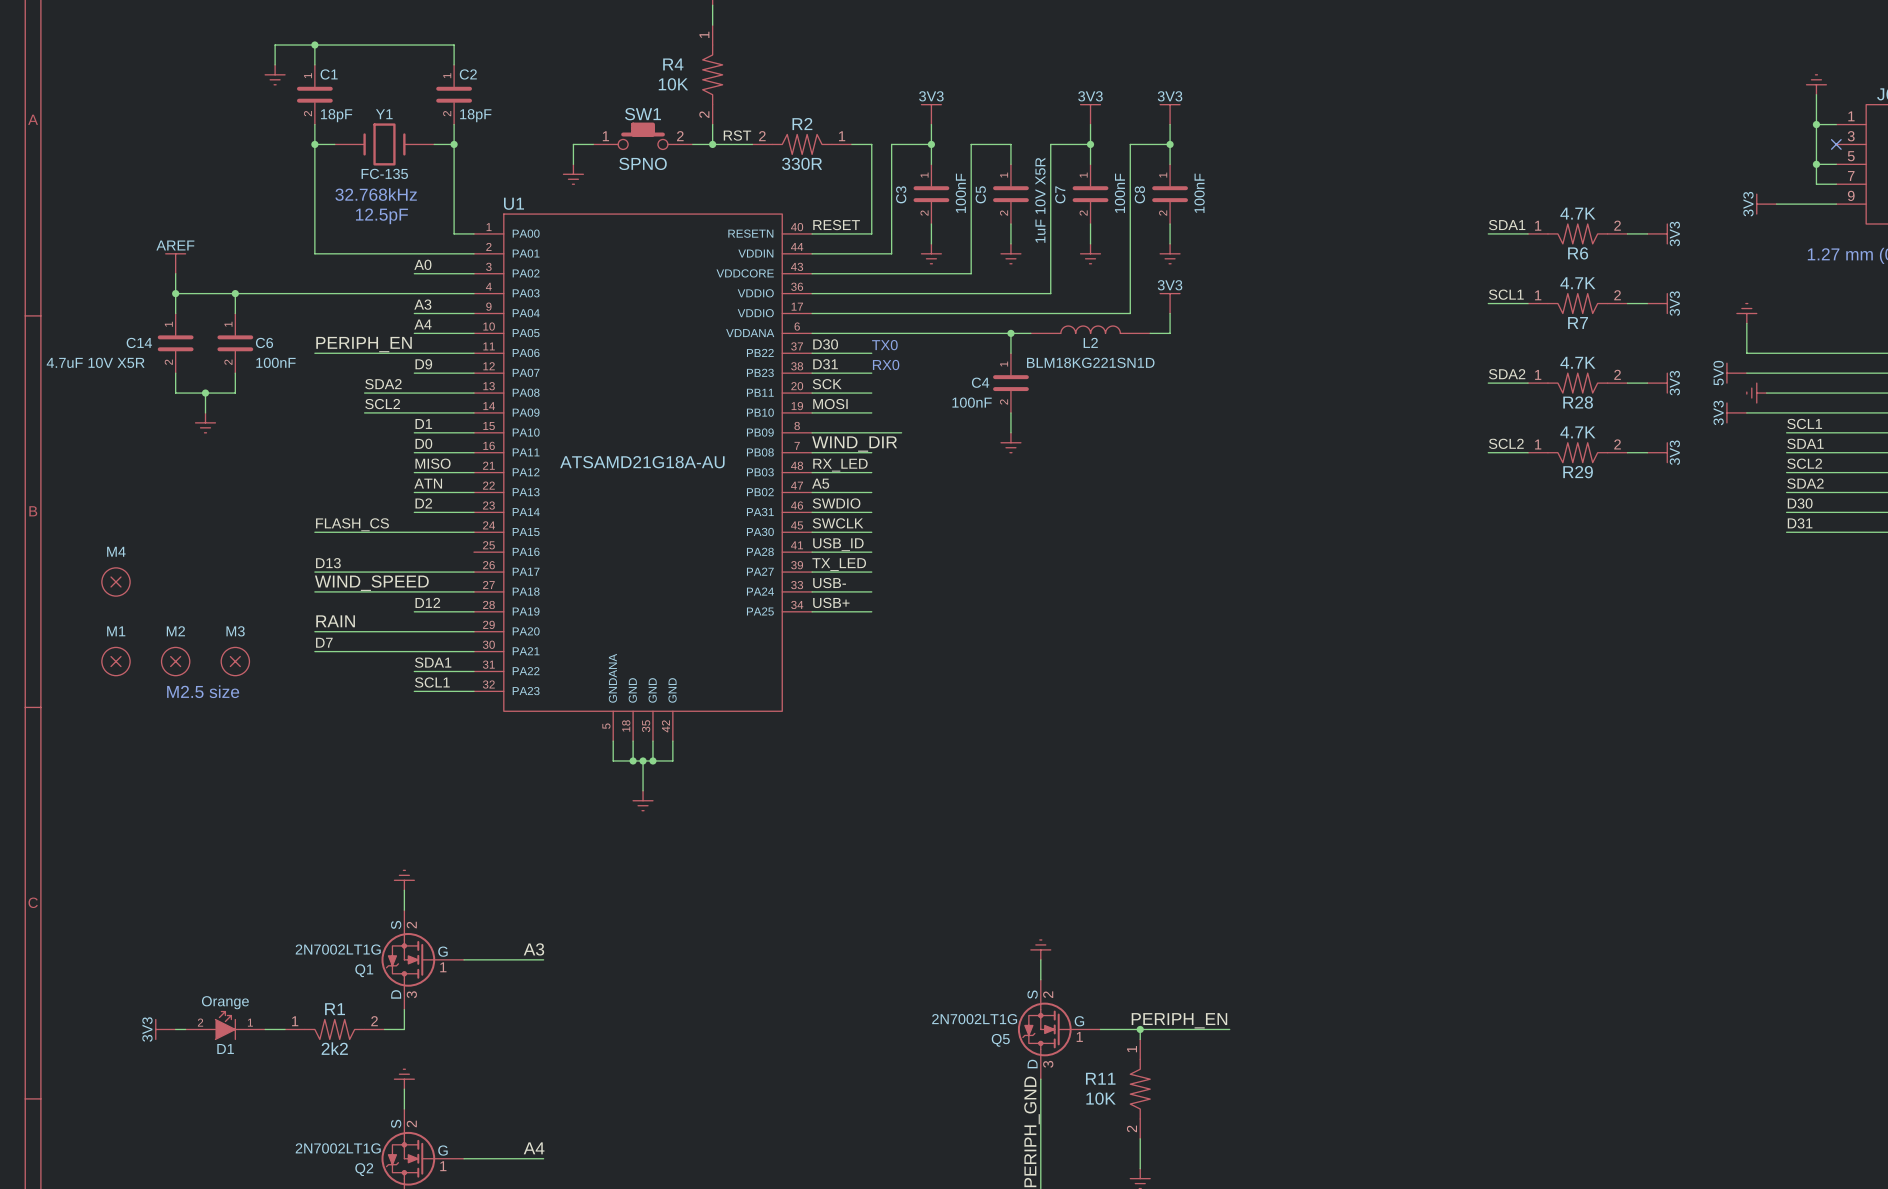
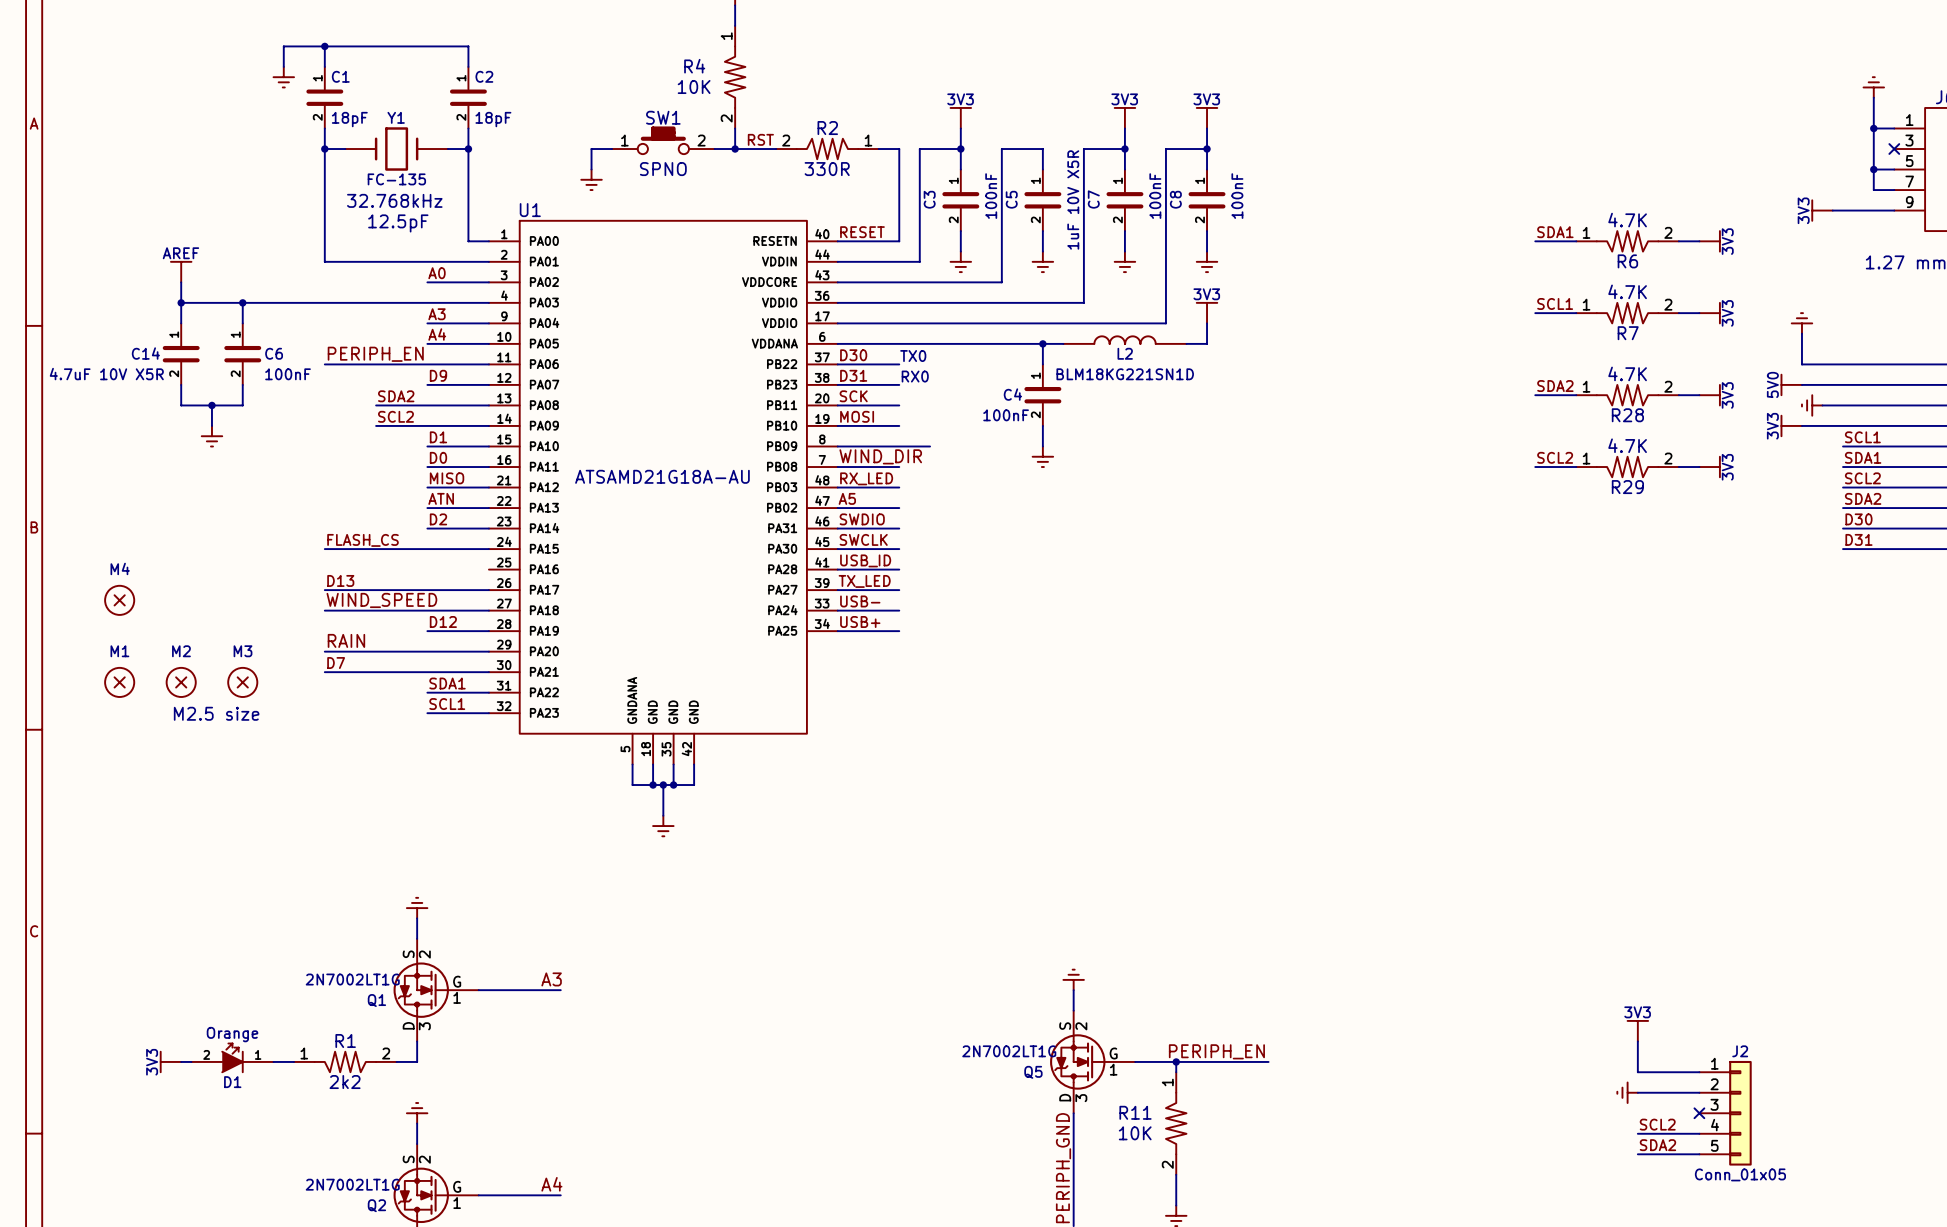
power symbol: none -> 3V3 (1637, 1031)
wire: none -> (1637, 1041) (1637, 1072) (1699, 1072)
power symbol: none -> (1627, 1092)
wire: none -> (1637, 1092) (1699, 1092)
no-connect mark: none -> (1699, 1113)
J2: none -> Conn_01x05 (1725, 1113)
label: none -> SCL2 (1657, 1124)
wire: none -> (1637, 1133) (1699, 1133)
label: none -> SDA2 (1657, 1145)
wire: none -> (1637, 1154) (1699, 1154)

